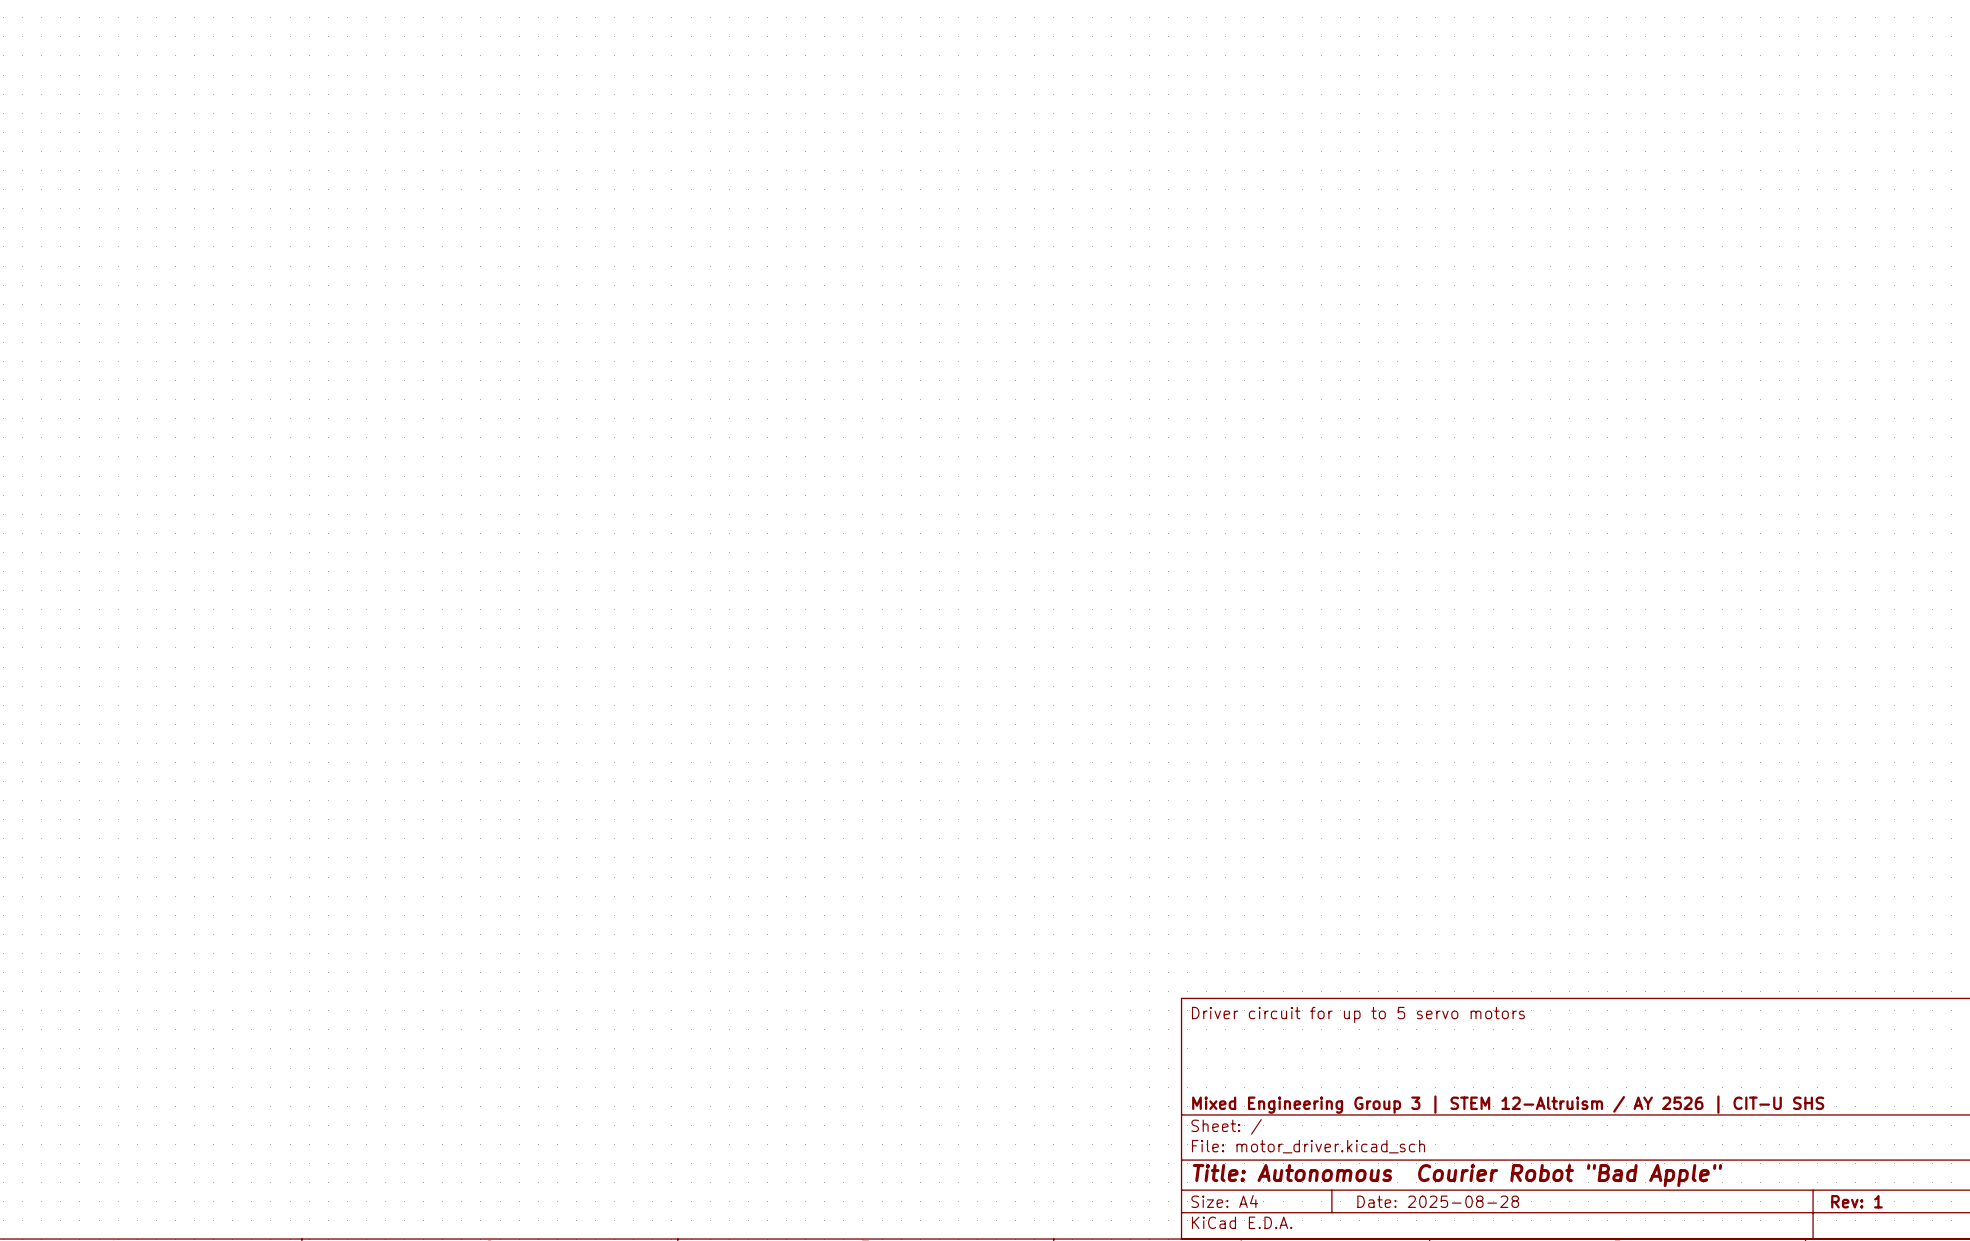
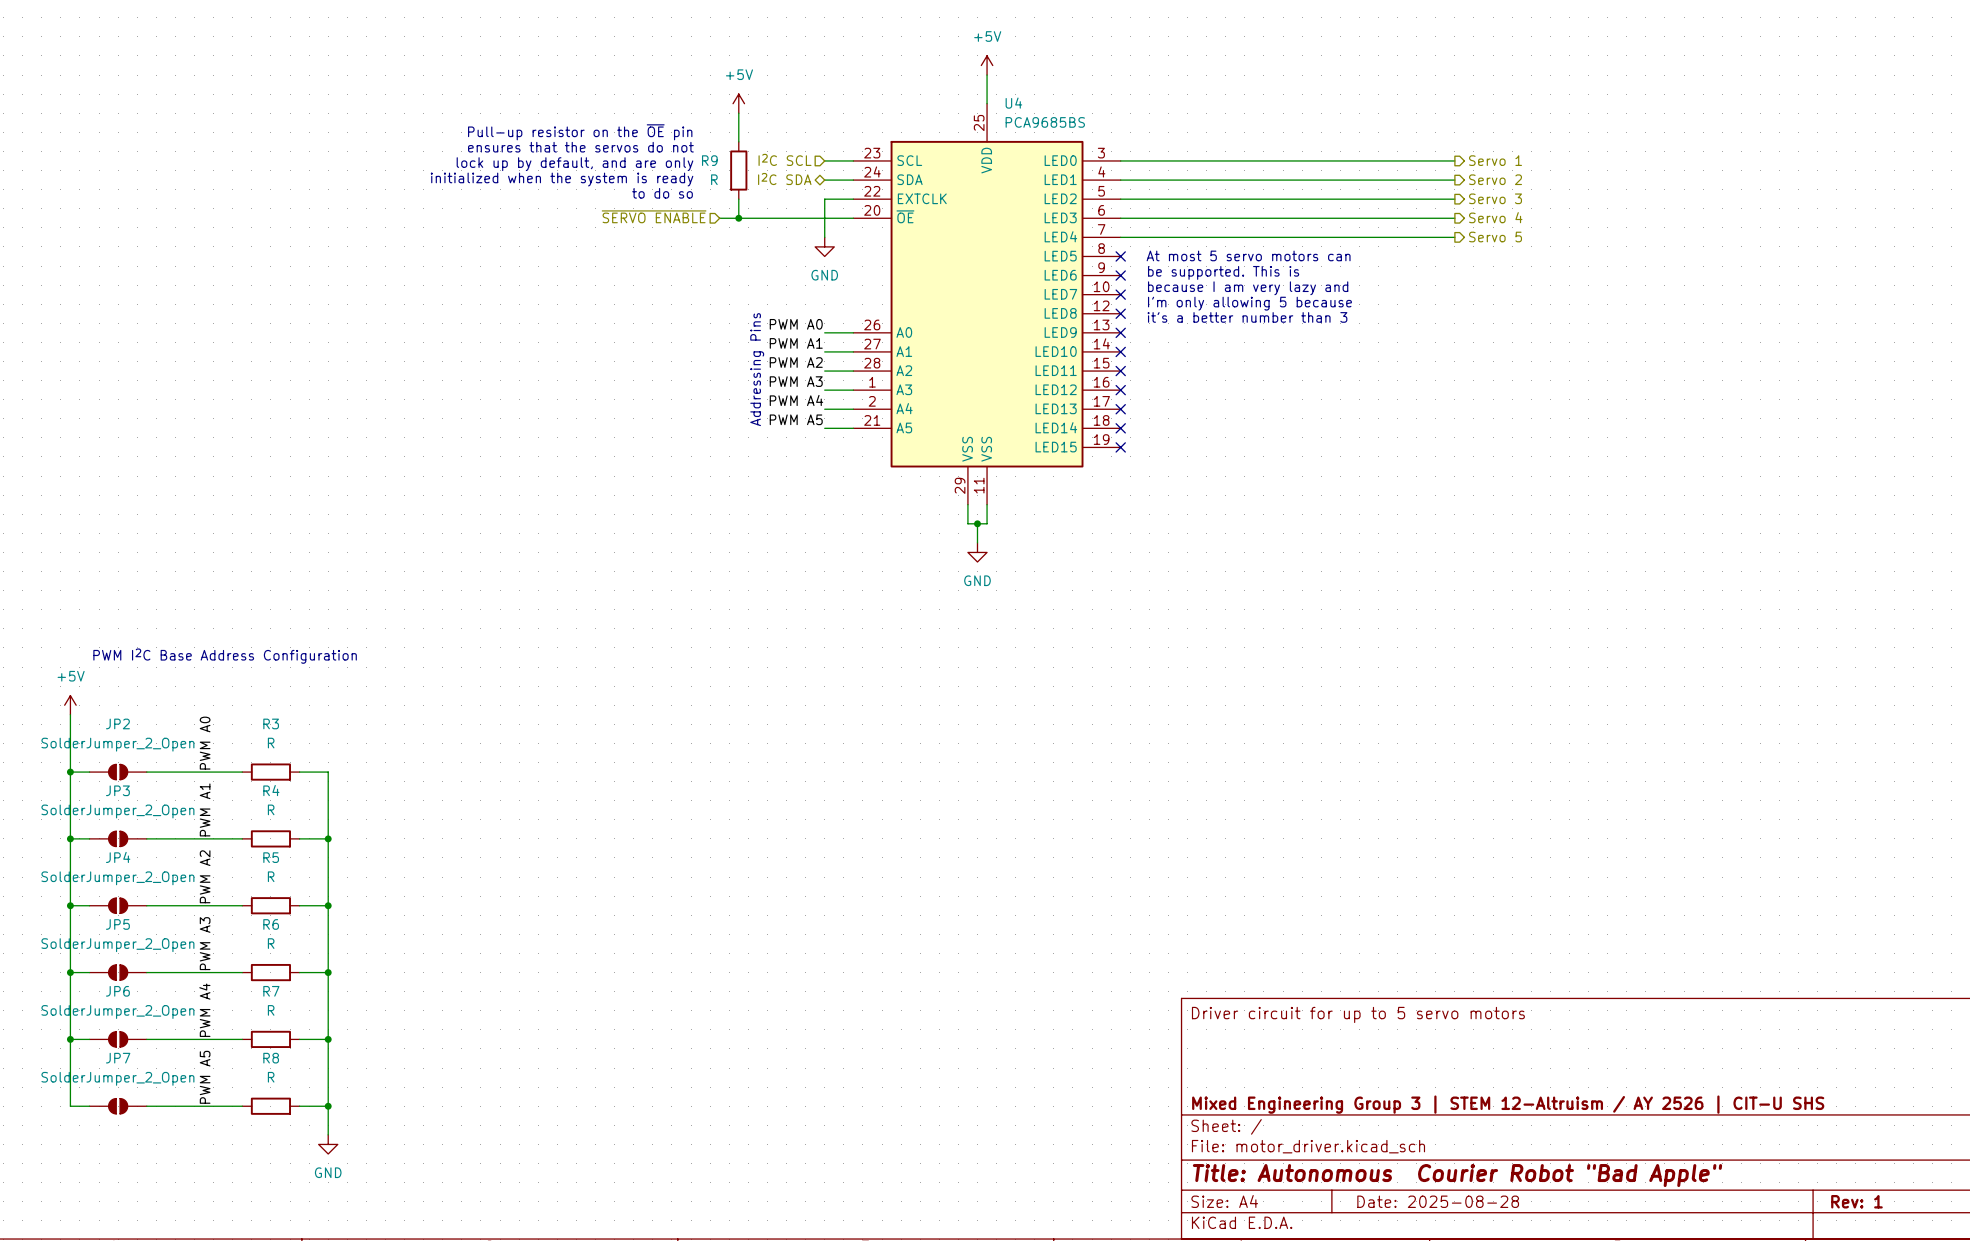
power symbol: none -> +5V (987, 65)
wire: none -> (987, 75) (987, 103)
power symbol: none -> +5V (738, 103)
wire: none -> (738, 113) (738, 141)
text: none -> Pull-up resistor on the ~{OE} pin (580, 132)
text: none -> ensures that the servos do not (580, 147)
hierarchical label: none -> I2C SCL (785, 159)
wire: none -> (824, 160) (853, 160)
wire: none -> (1120, 160) (1454, 160)
hierarchical label: none -> Servo 1 (1495, 160)
text: none -> lock up by default, and are only (574, 164)
R9: none -> R (738, 170)
text: none -> initialized when the system is ready (562, 179)
hierarchical label: none -> I2C SDA (784, 179)
hierarchical label: none -> Servo 2 (1495, 179)
wire: none -> (824, 180) (853, 180)
wire: none -> (1120, 180) (1454, 180)
text: none -> to do so (662, 193)
hierarchical label: none -> Servo 3 (1495, 198)
wire: none -> (738, 199) (738, 218)
wire: none -> (853, 199) (824, 199) (824, 237)
wire: none -> (1120, 199) (1454, 199)
hierarchical label: none -> ~{SERVO ENABLE} (654, 216)
hierarchical label: none -> Servo 4 (1495, 217)
wire: none -> (719, 218) (853, 218)
junction: none -> (738, 218)
wire: none -> (1120, 218) (1454, 218)
wire: none -> (1120, 237) (1454, 237)
hierarchical label: none -> Servo 5 (1495, 237)
power symbol: none -> GND (824, 246)
text: none -> At most 5 servo motors can (1248, 255)
no-connect mark: none -> (1120, 256)
text: none -> be supported. This is (1223, 272)
no-connect mark: none -> (1120, 275)
text: none -> because I am very lazy and (1248, 288)
no-connect mark: none -> (1120, 294)
text: none -> I'm only allowing 5 because (1249, 303)
U4: none -> PCA9685BS (987, 304)
no-connect mark: none -> (1120, 313)
text: none -> it's a better number than 3 (1247, 317)
label: none -> PWM A0 (796, 324)
wire: none -> (824, 332) (853, 332)
no-connect mark: none -> (1120, 332)
label: none -> PWM A1 (796, 343)
wire: none -> (824, 351) (853, 351)
no-connect mark: none -> (1120, 351)
label: none -> PWM A2 (796, 362)
text: none -> Addressing Pins (757, 369)
wire: none -> (824, 371) (853, 371)
no-connect mark: none -> (1120, 371)
label: none -> PWM A3 (796, 381)
wire: none -> (824, 390) (853, 390)
no-connect mark: none -> (1120, 390)
label: none -> PWM A4 (796, 400)
wire: none -> (824, 409) (853, 409)
no-connect mark: none -> (1120, 409)
label: none -> PWM A5 (796, 419)
wire: none -> (824, 428) (853, 428)
no-connect mark: none -> (1120, 428)
no-connect mark: none -> (1120, 447)
wire: none -> (967, 504) (967, 523) (987, 523) (987, 504)
wire: none -> (977, 523) (977, 542)
junction: none -> (977, 523)
power symbol: none -> GND (977, 552)
text: none -> PWM I2C Base Address Configuration (225, 656)
power symbol: none -> +5V (70, 705)
wire: none -> (70, 714) (70, 1106) (89, 1106)
label: none -> PWM A0 (205, 743)
wire: none -> (70, 772) (89, 772)
junction: none -> (70, 772)
JP2: none -> SolderJumper_2_Open (118, 772)
wire: none -> (146, 772) (242, 772)
R3: none -> R (270, 772)
wire: none -> (299, 772) (328, 772) (328, 1134)
label: none -> PWM A1 (205, 809)
wire: none -> (70, 838) (89, 838)
junction: none -> (70, 838)
JP3: none -> SolderJumper_2_Open (118, 838)
wire: none -> (146, 838) (242, 838)
R4: none -> R (270, 838)
wire: none -> (299, 838) (328, 838)
junction: none -> (328, 838)
label: none -> PWM A2 (205, 876)
wire: none -> (70, 905) (89, 905)
junction: none -> (70, 905)
JP4: none -> SolderJumper_2_Open (118, 905)
wire: none -> (146, 905) (242, 905)
R5: none -> R (270, 905)
wire: none -> (299, 905) (328, 905)
junction: none -> (328, 905)
label: none -> PWM A3 (205, 943)
wire: none -> (70, 972) (89, 972)
junction: none -> (70, 972)
JP5: none -> SolderJumper_2_Open (118, 972)
wire: none -> (146, 972) (242, 972)
R6: none -> R (270, 972)
wire: none -> (299, 972) (328, 972)
junction: none -> (328, 972)
label: none -> PWM A4 (204, 1010)
wire: none -> (70, 1039) (89, 1039)
junction: none -> (70, 1039)
JP6: none -> SolderJumper_2_Open (118, 1039)
wire: none -> (146, 1039) (242, 1039)
R7: none -> R (270, 1039)
wire: none -> (299, 1039) (328, 1039)
junction: none -> (328, 1039)
label: none -> PWM A5 (205, 1077)
JP7: none -> SolderJumper_2_Open (118, 1106)
wire: none -> (146, 1106) (242, 1106)
R8: none -> R (270, 1106)
wire: none -> (299, 1106) (328, 1106)
junction: none -> (328, 1106)
power symbol: none -> GND (328, 1144)

